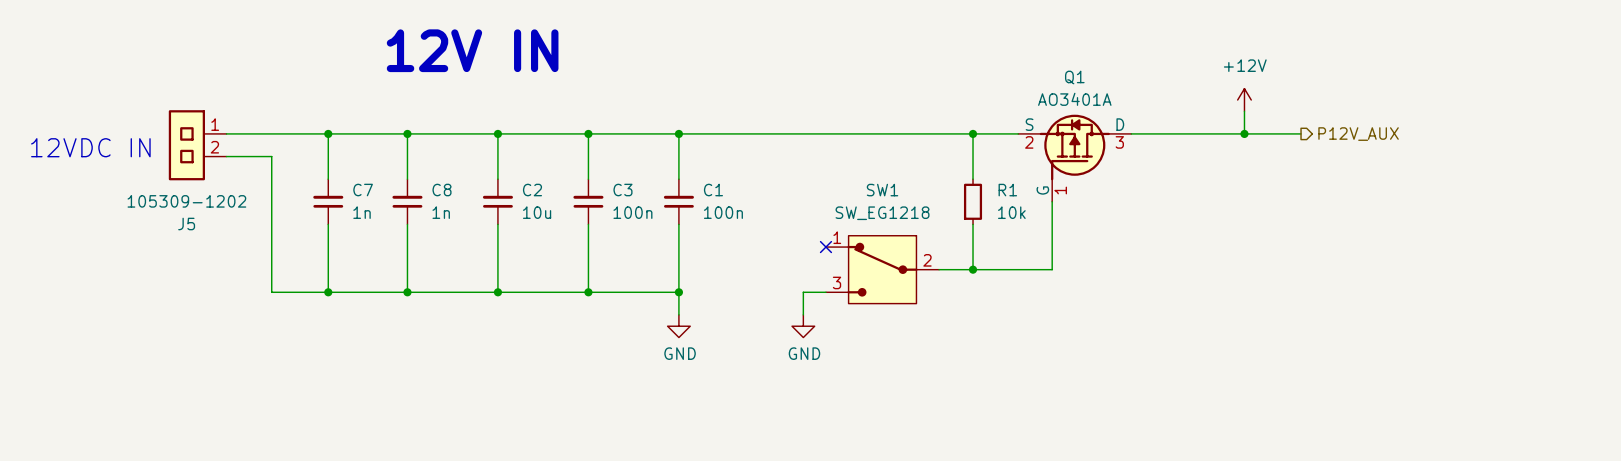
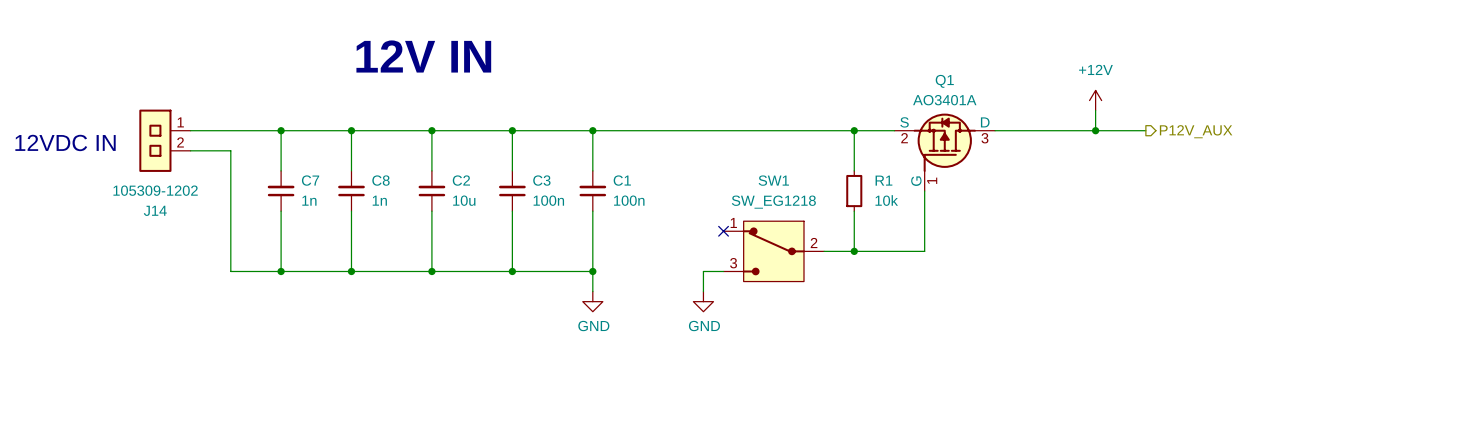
J5 name: J5 (186, 224) -> J14 (155, 210)

